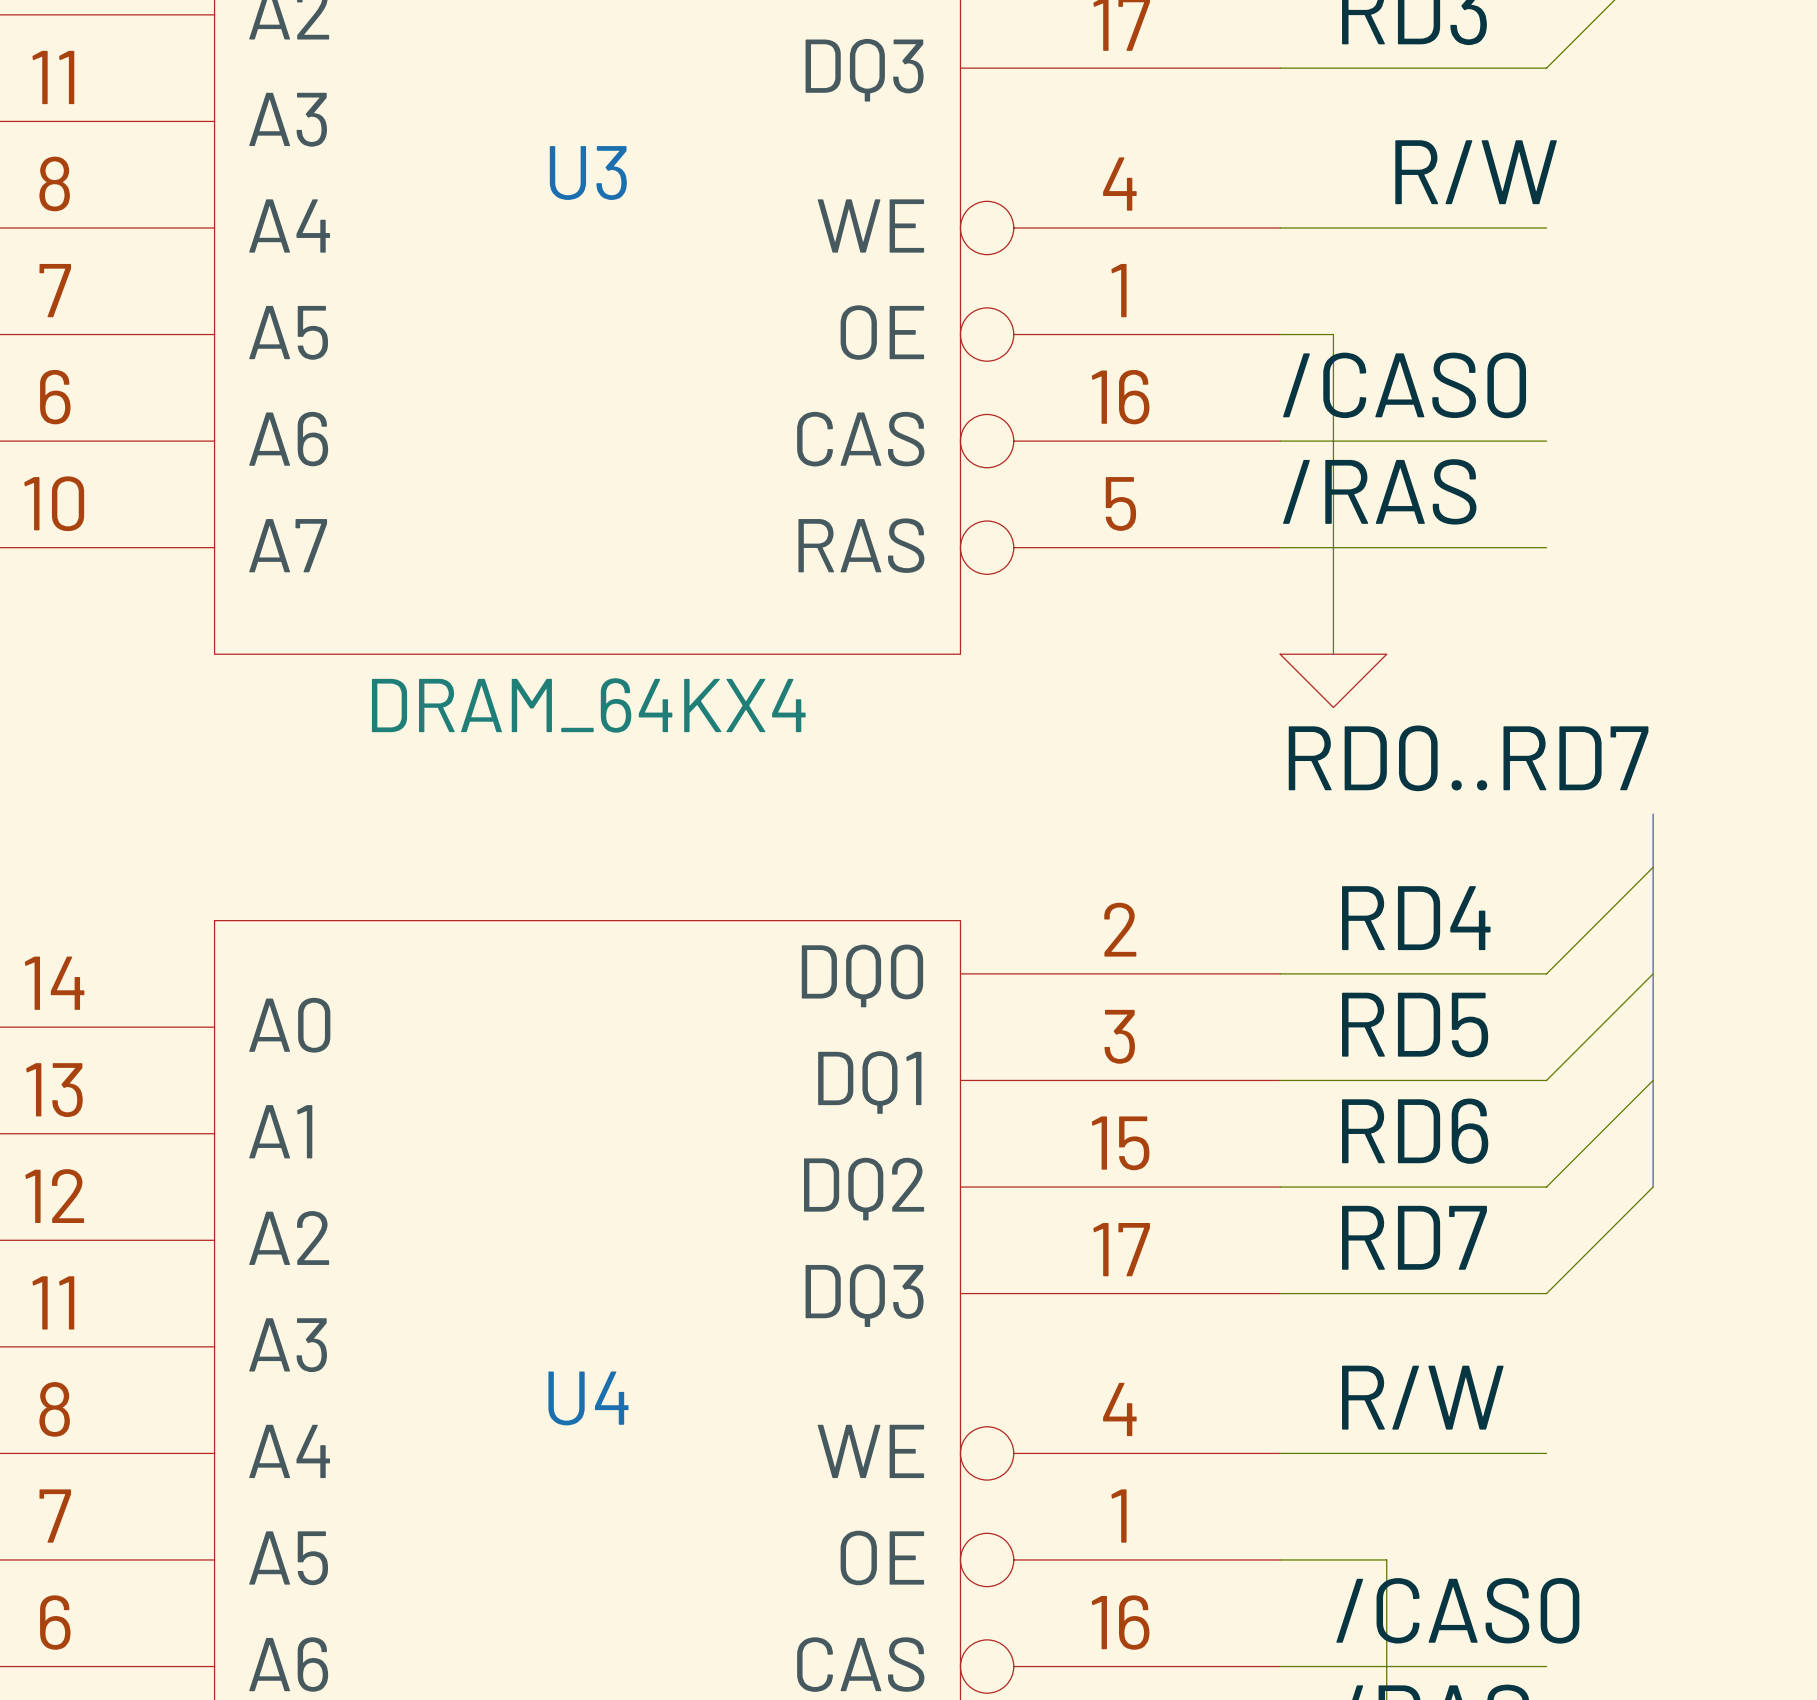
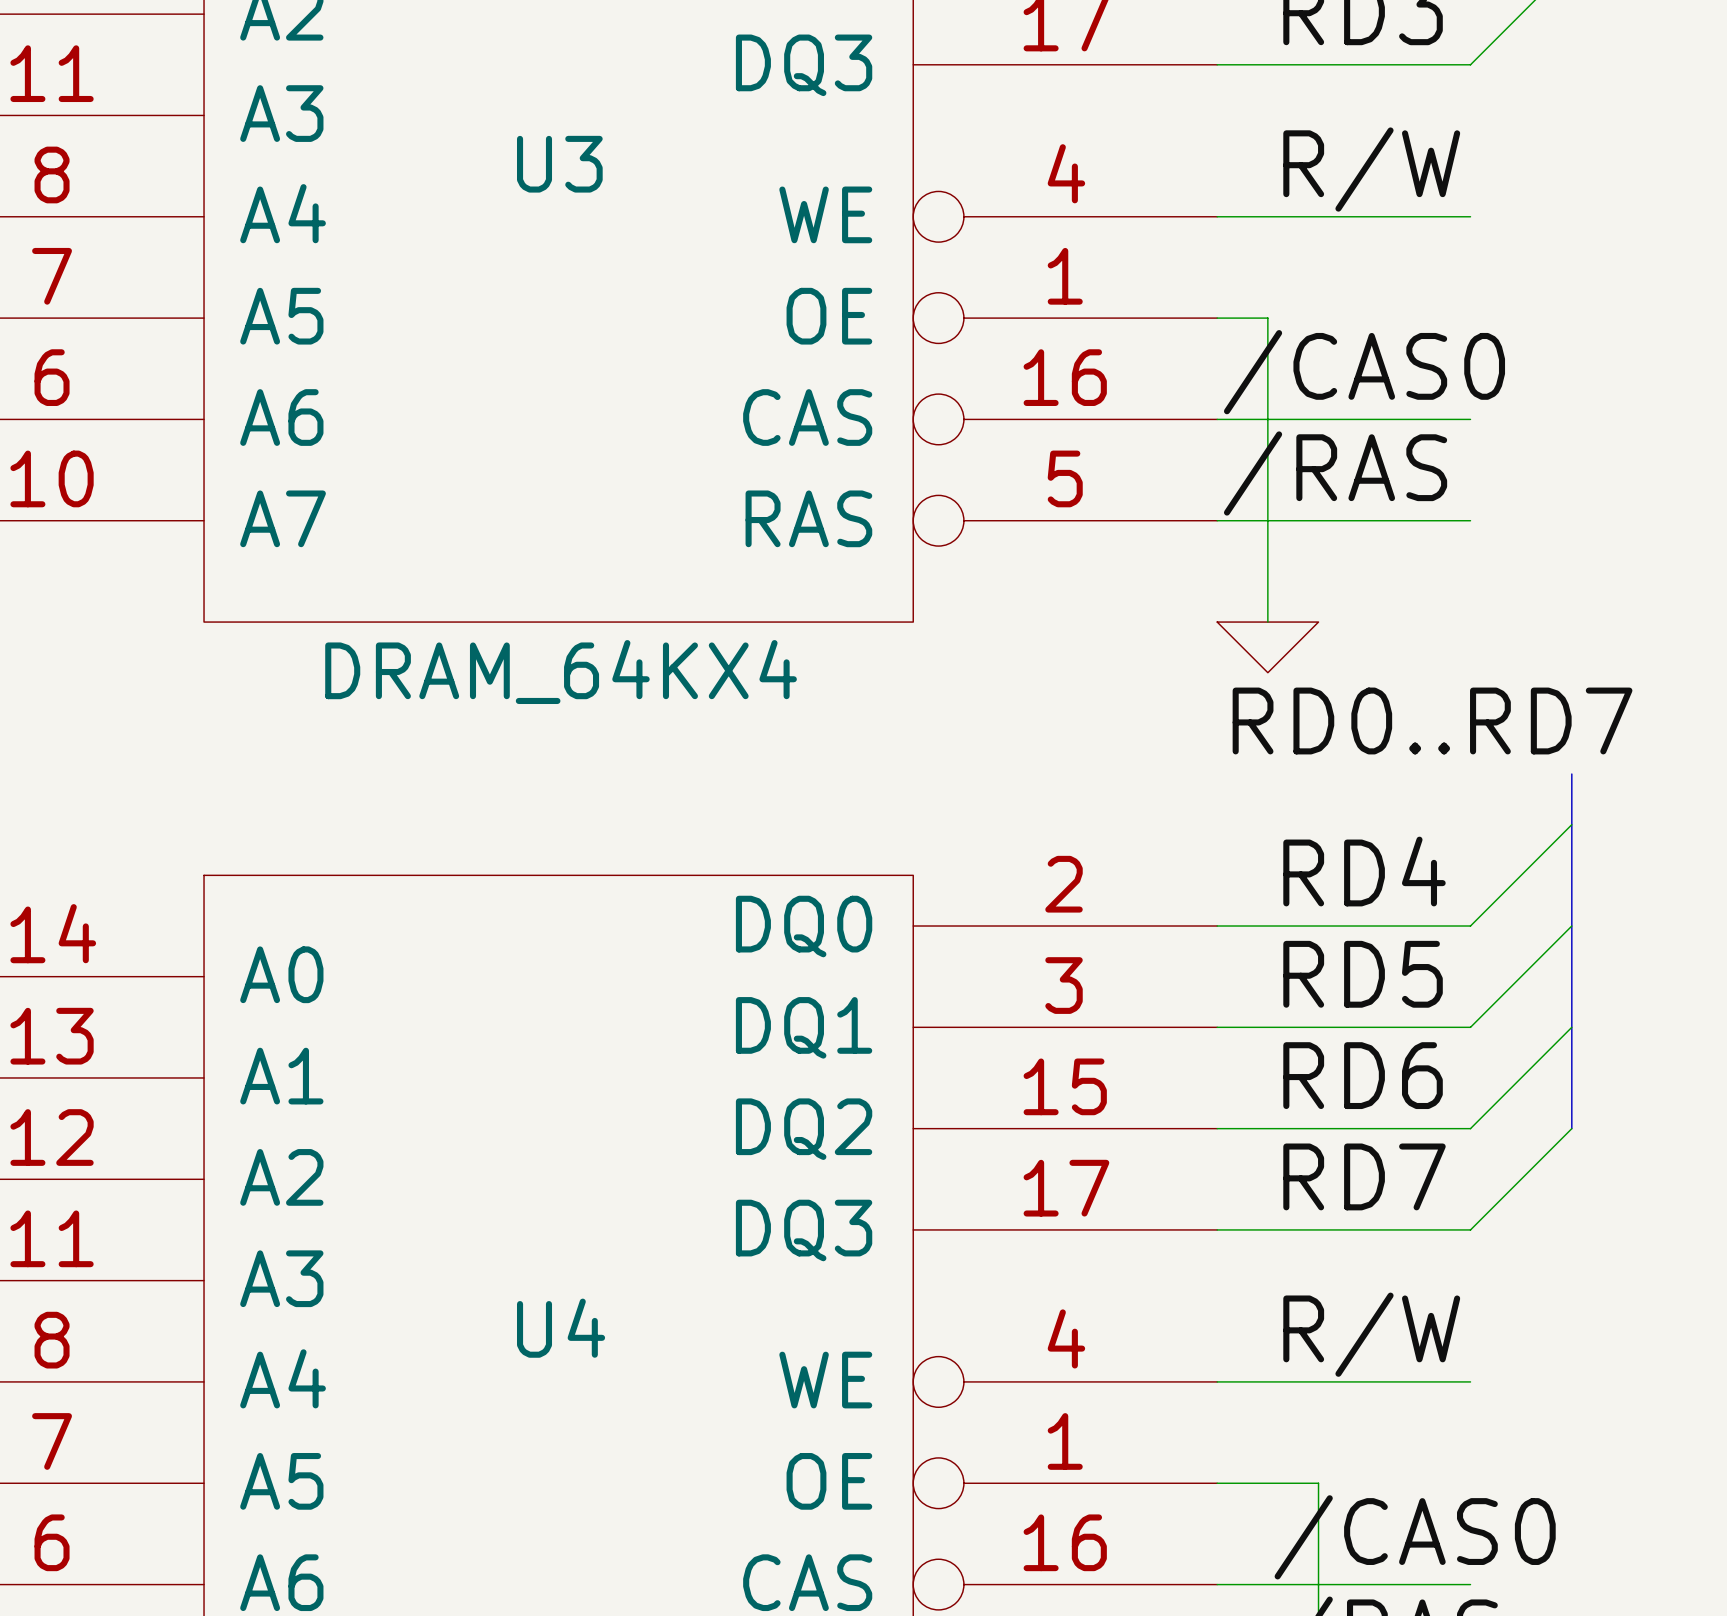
label position: R/W (1476, 172) -> R/W (1371, 169)

